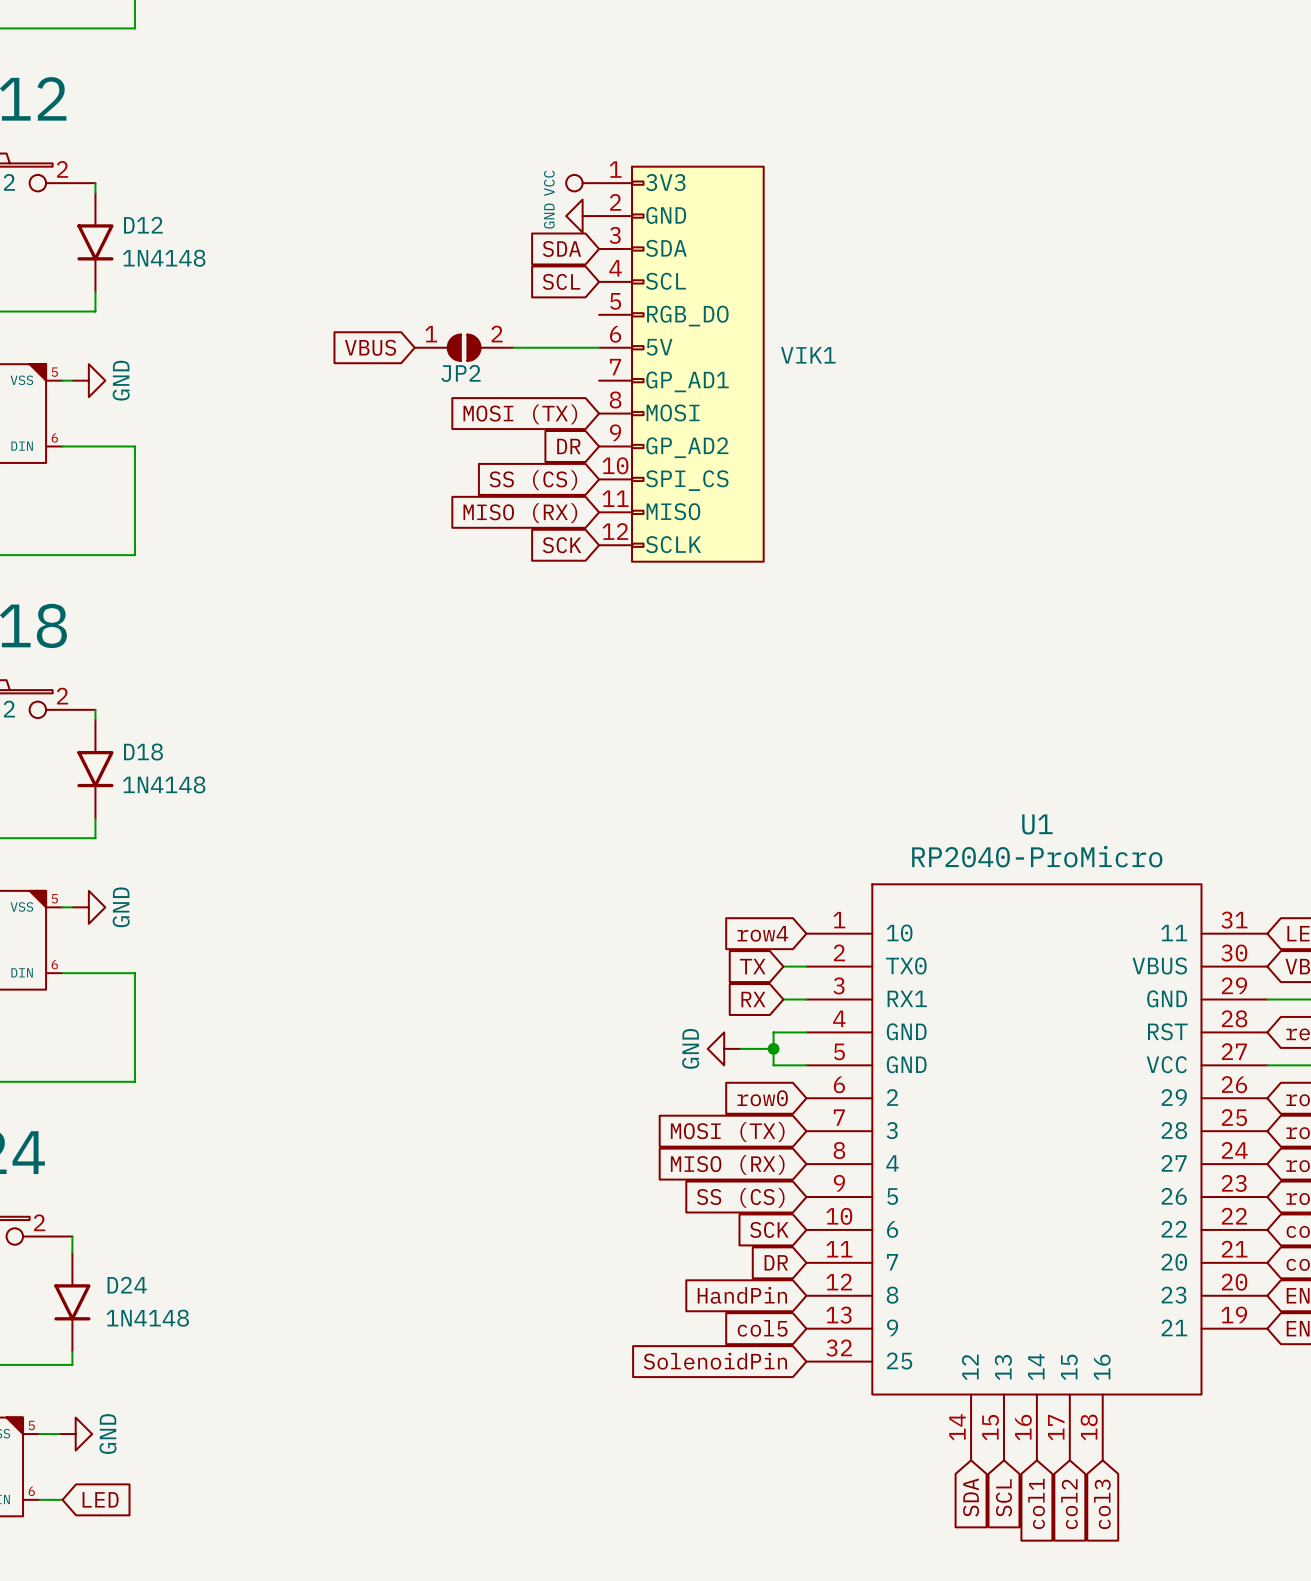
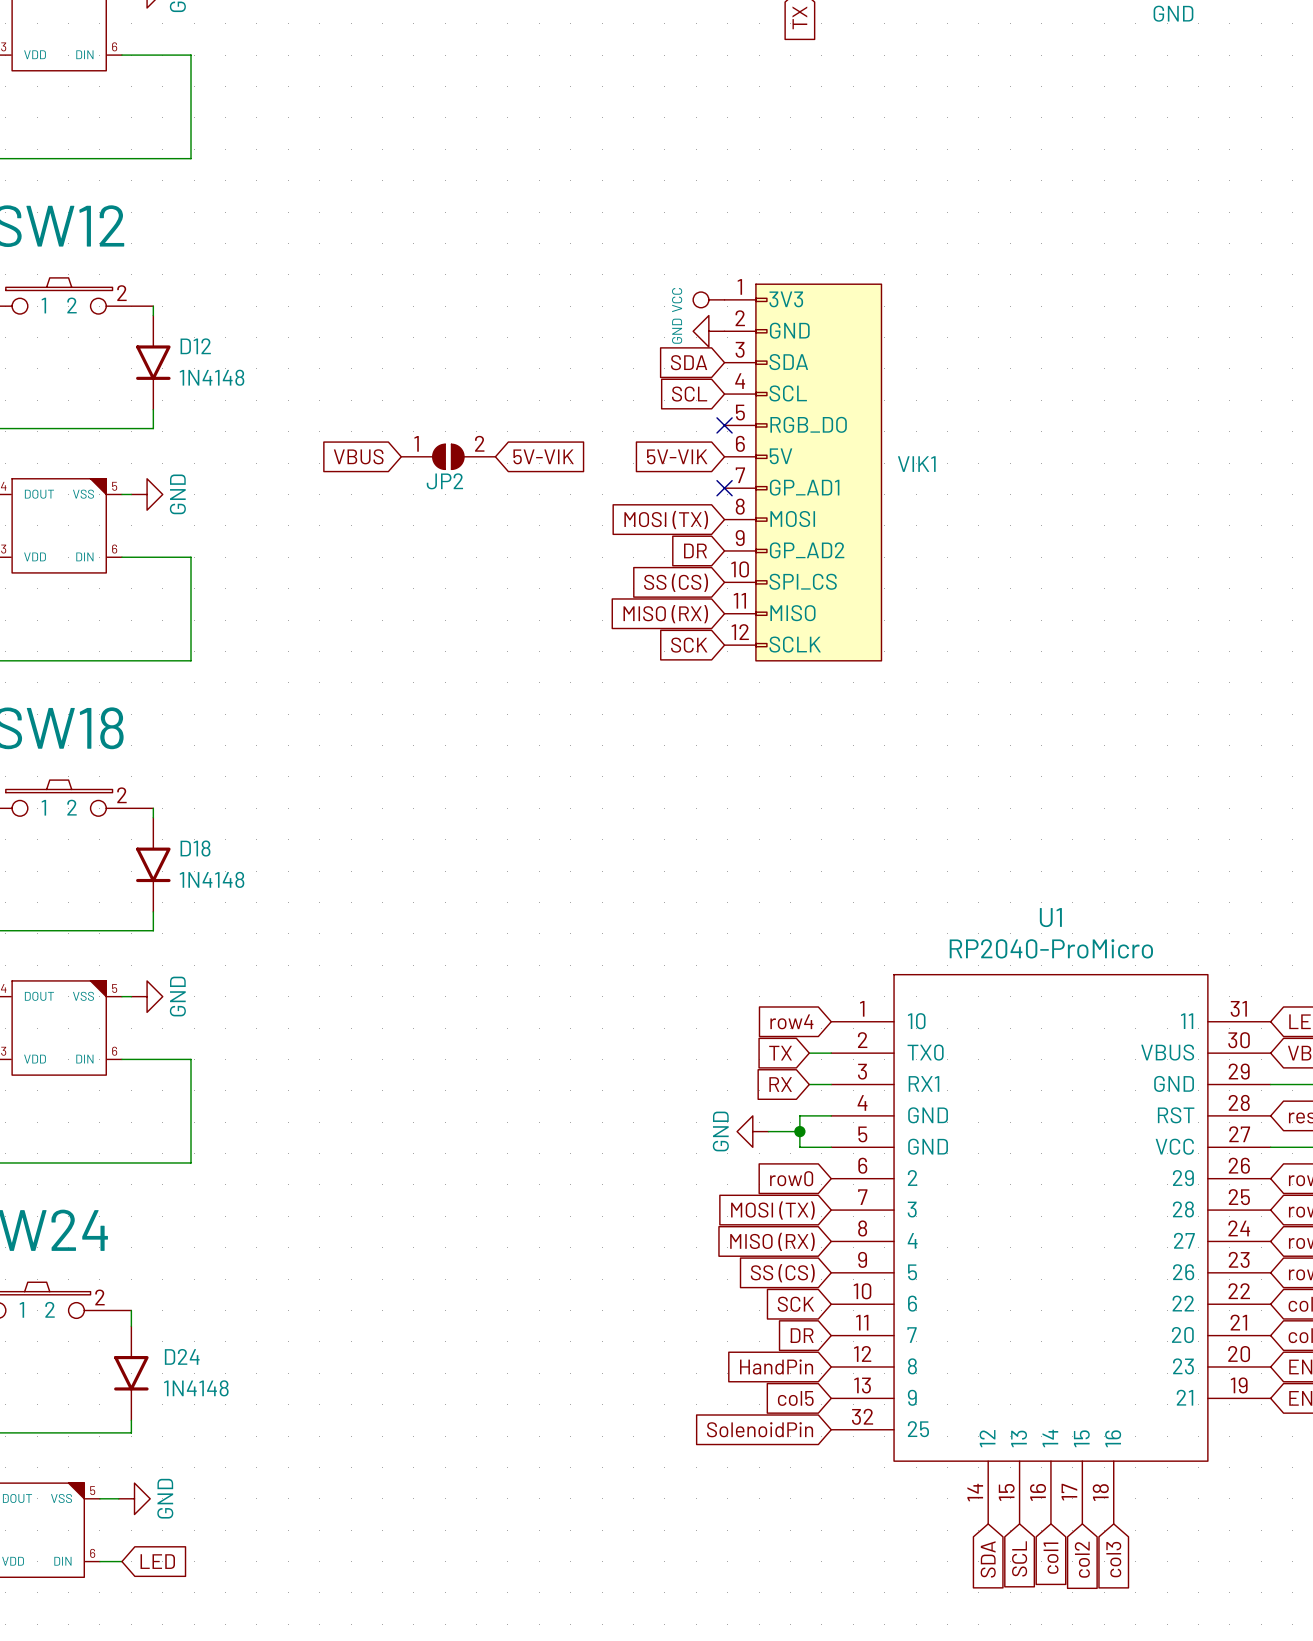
power symbol position: VCC (582, 183) -> VCC (708, 299)
power symbol position: GND (582, 216) -> GND (708, 331)
global label position: SDA (561, 248) -> SDA (689, 362)
global label position: SCL (561, 281) -> SCL (689, 394)
no-connect mark: none -> (724, 425)
global label: none -> 5V-VIK (543, 456)
global label: none -> 5V-VIK (677, 456)
global label position: VBUS (370, 347) -> VBUS (358, 456)
JP2 position: (464, 347) -> (448, 456)
wire: (513, 347) (599, 347) -> none
VIK1 position: (681, 364) -> (803, 472)
no-connect mark: none -> (724, 488)
global label position: MOSI (TX) (520, 414) -> MOSI (TX) (666, 520)
global label position: DR (568, 446) -> DR (695, 550)
global label position: SS (CS) (533, 480) -> SS (CS) (676, 582)
global label position: MISO (RX) (520, 513) -> MISO (RX) (665, 614)
global label position: SCK (561, 545) -> SCK (689, 645)

